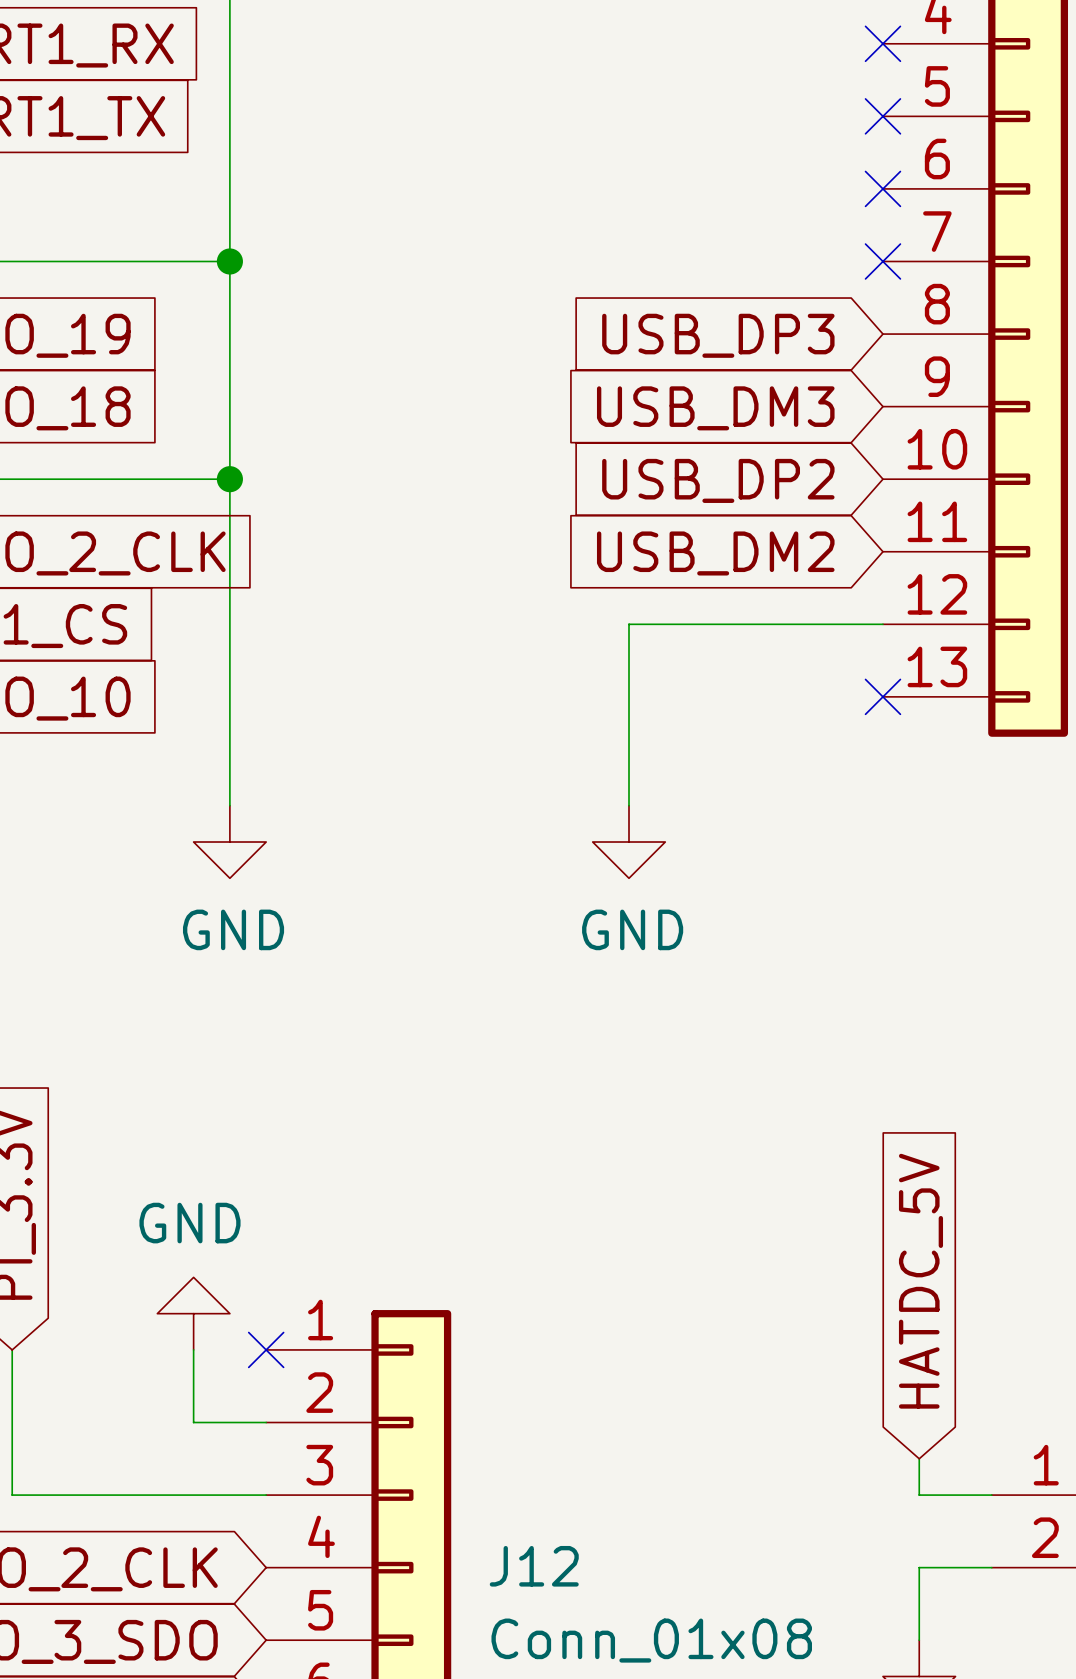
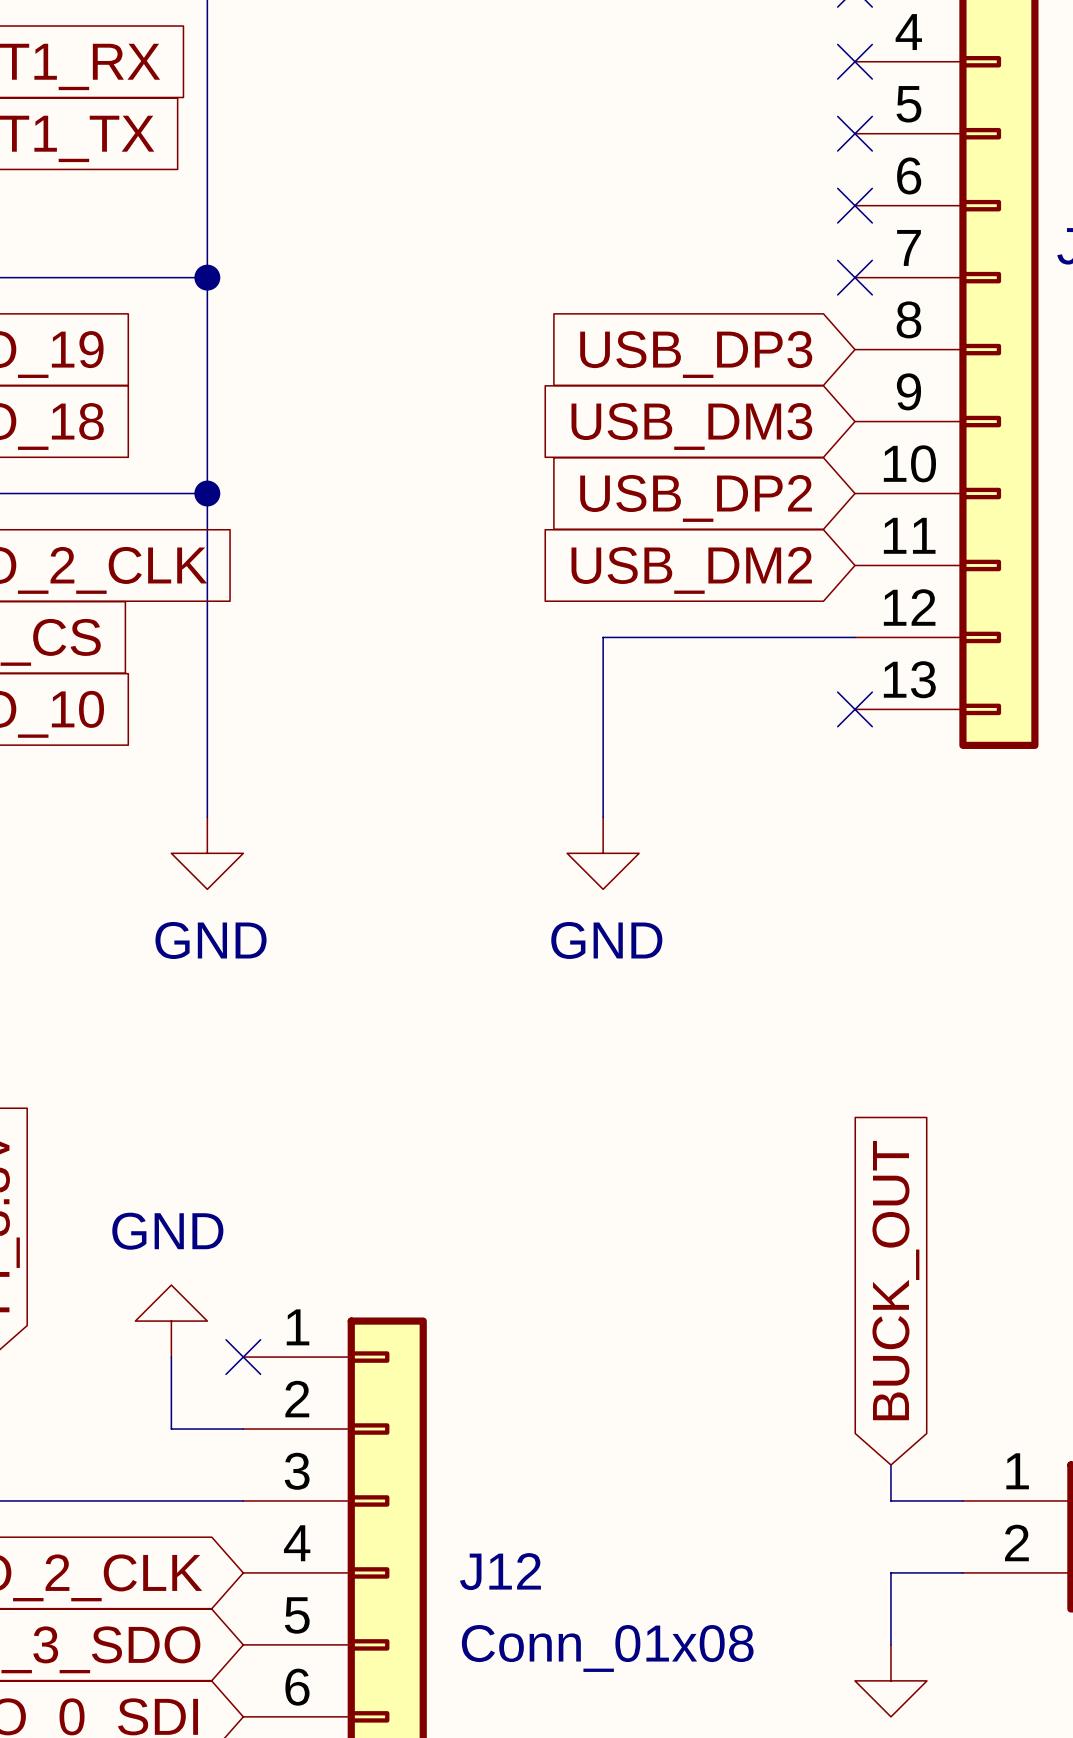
global label: HATDC_5V (920, 1281) -> BUCK_OUT (895, 1280)

